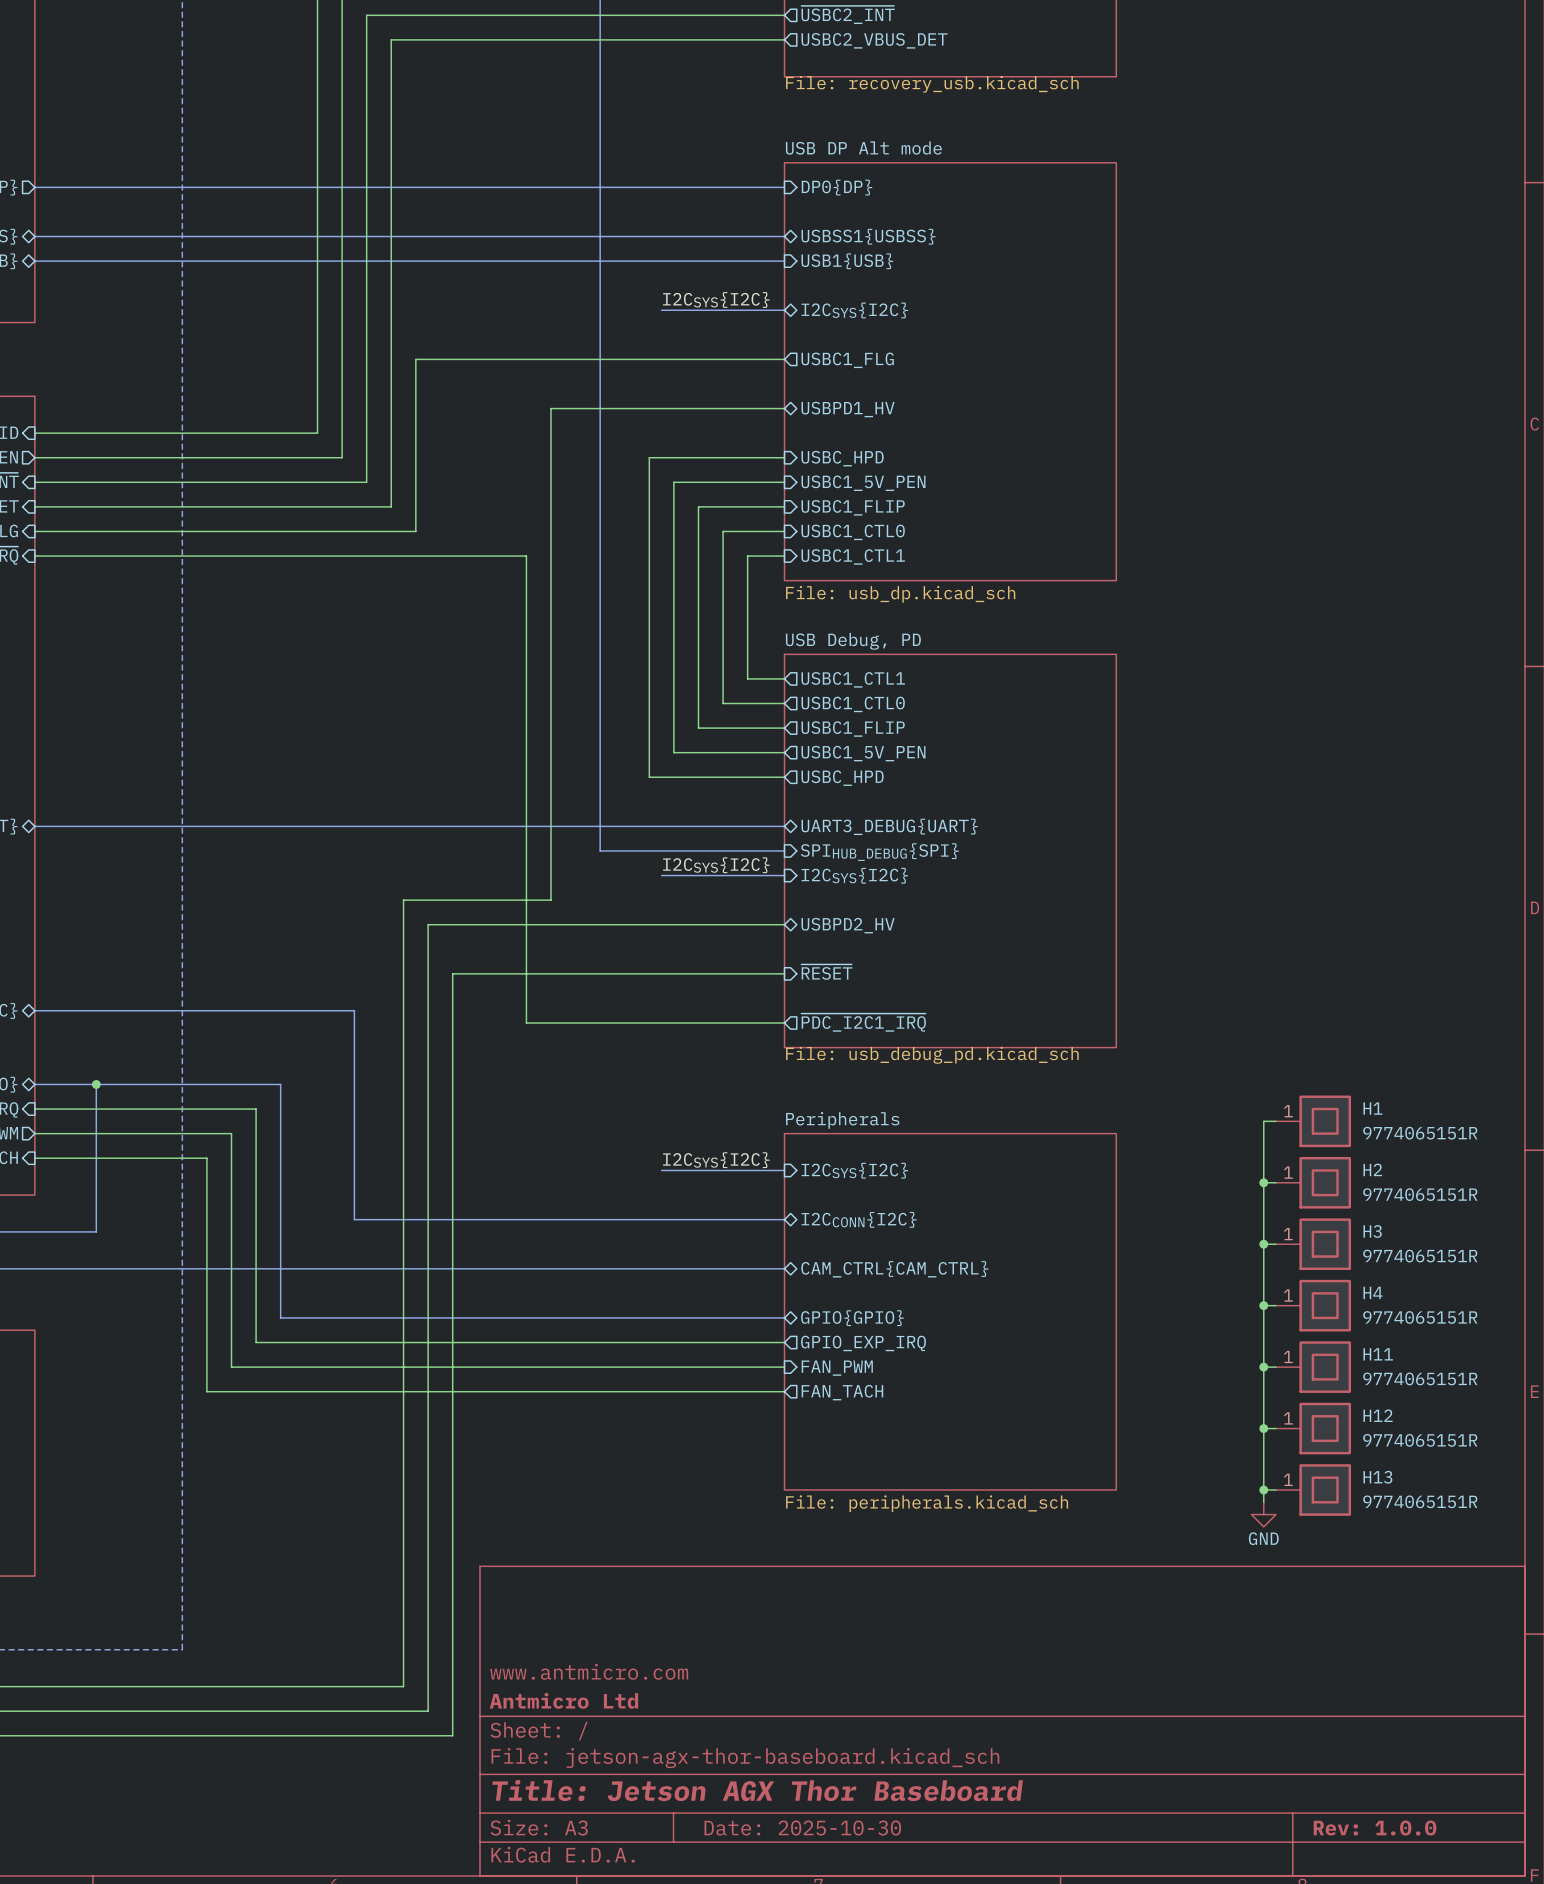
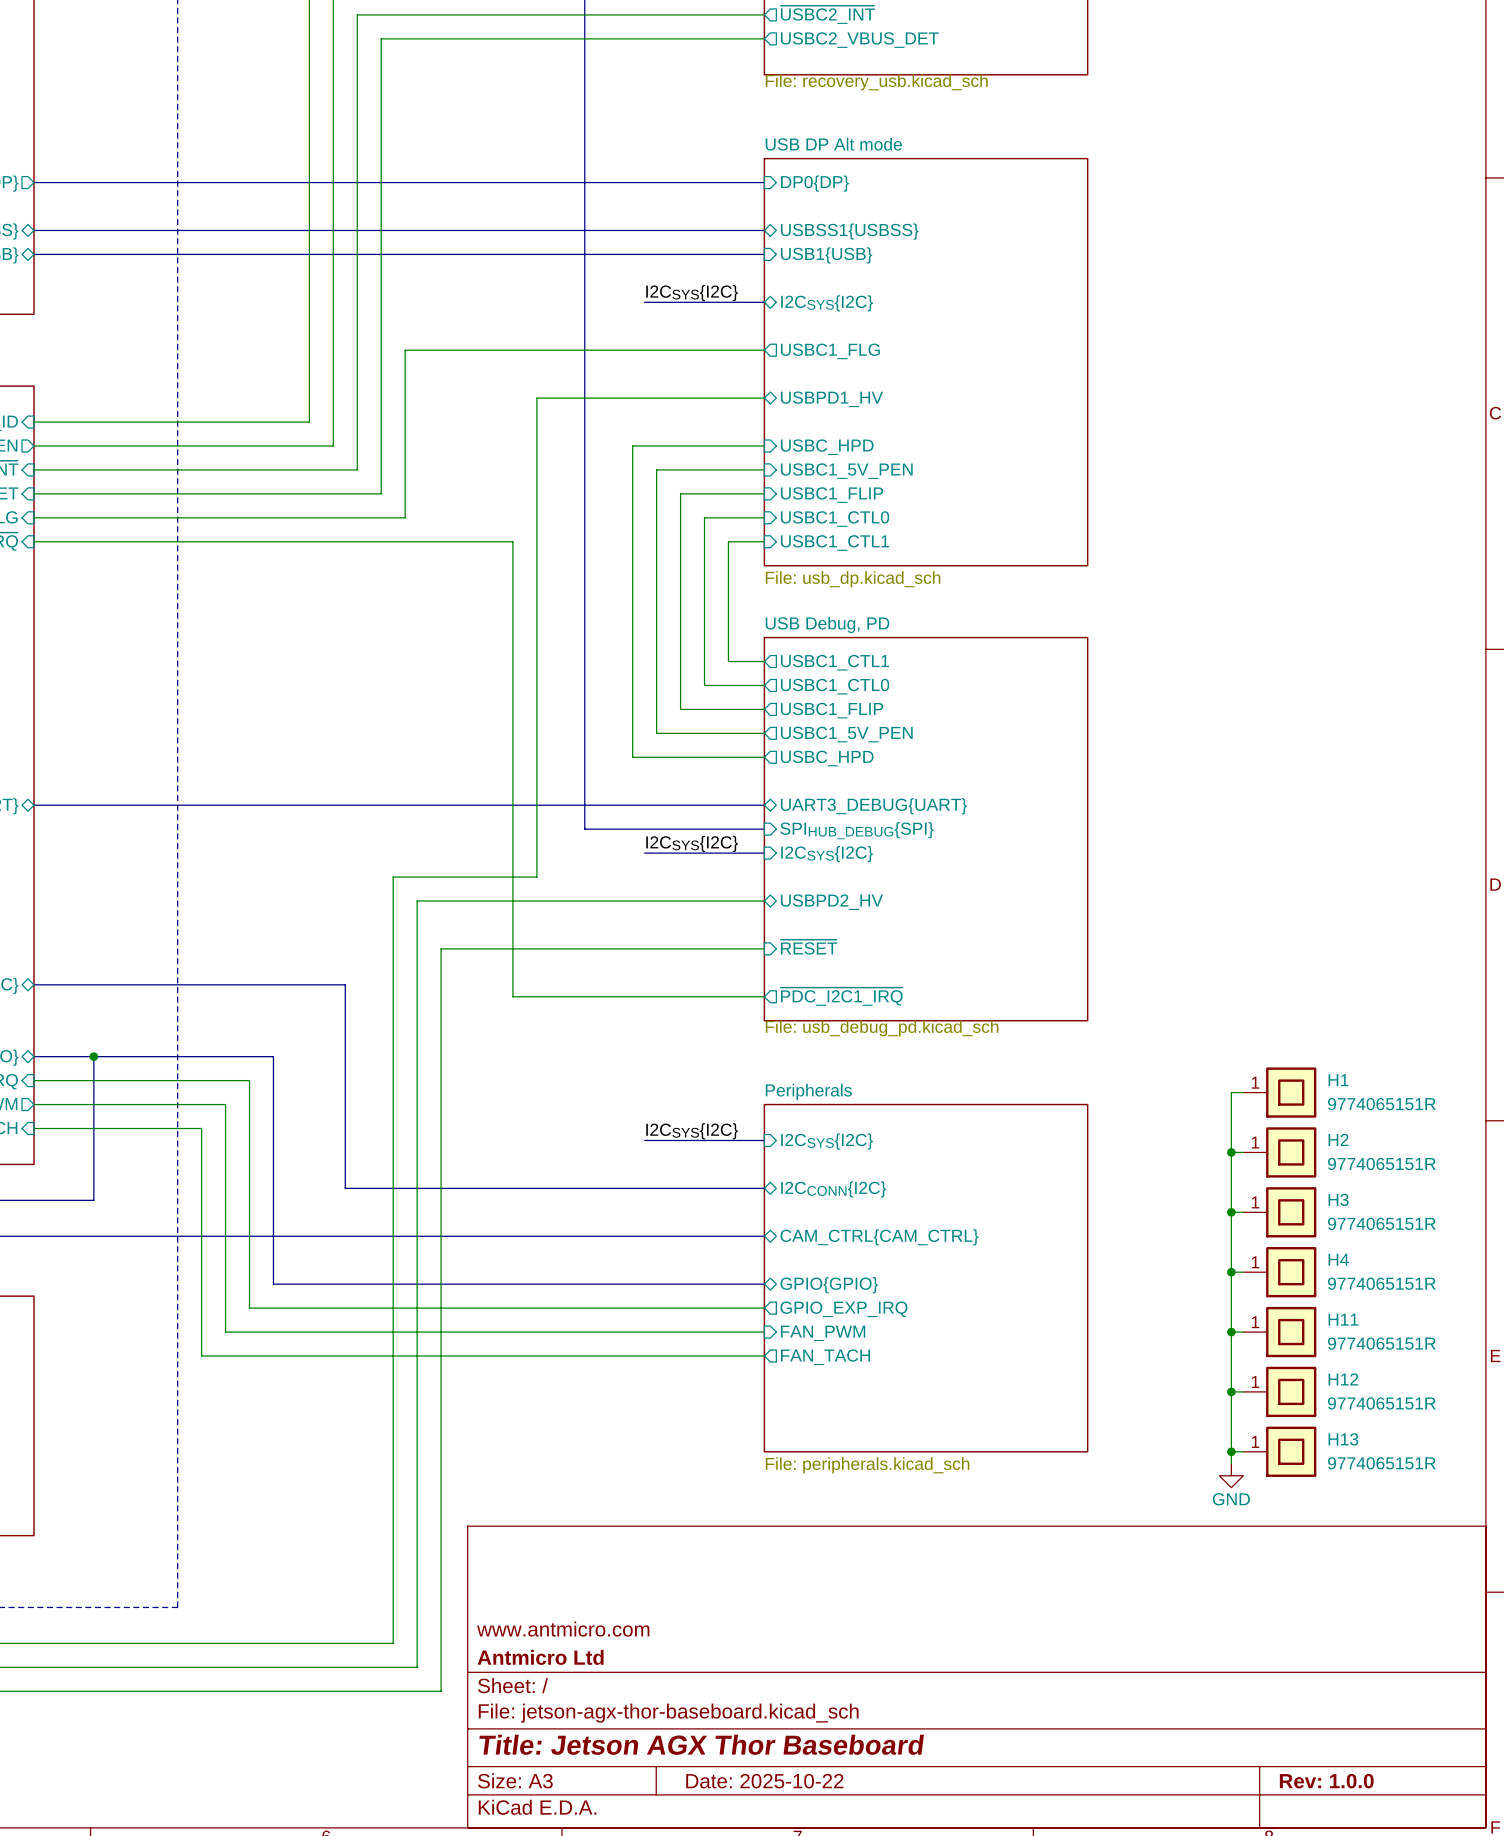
title block: Date: 2025-10-30 (802, 1828) -> Date: 2025-10-22 (764, 1781)

